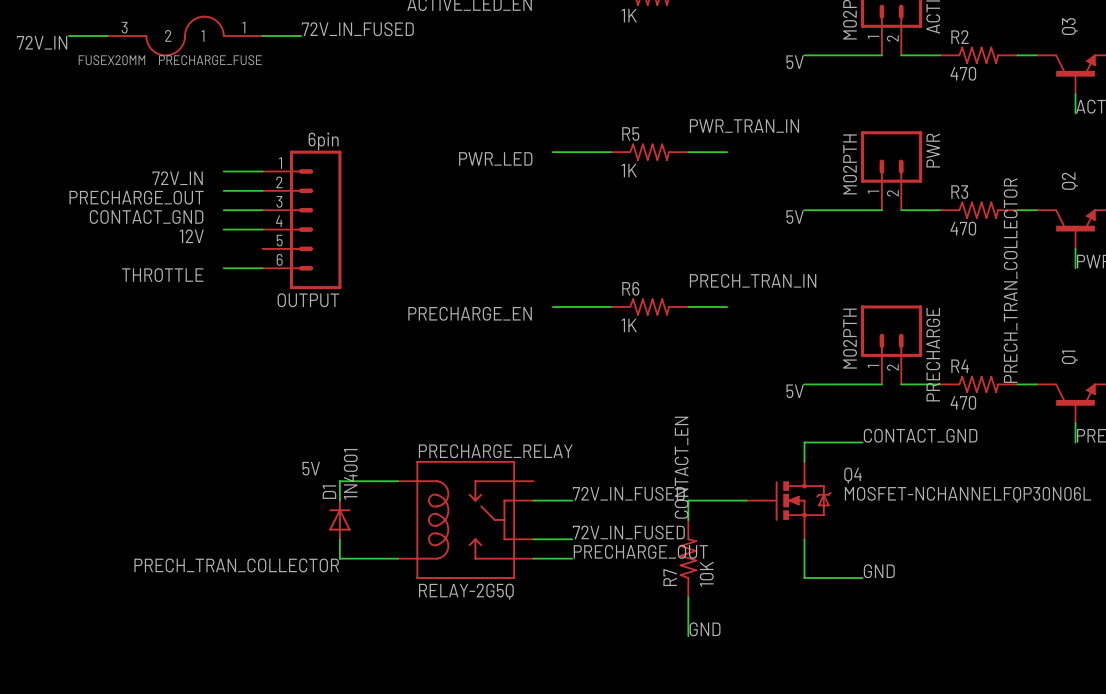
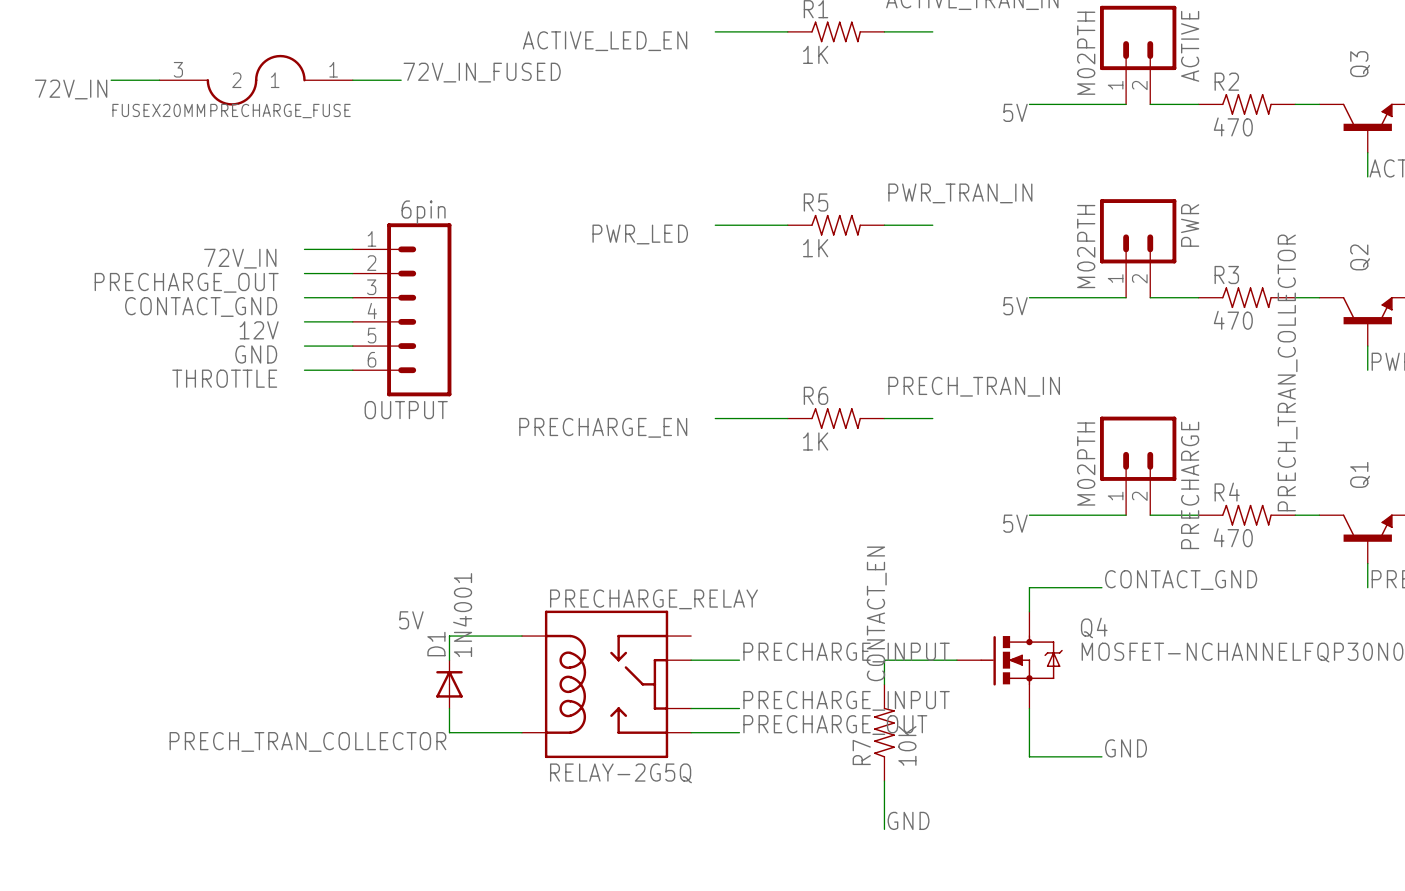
wire: none -> (304, 346) (352, 346)
label: none -> GND (256, 354)
label: 72V_IN_FUSED (628, 493) -> PRECHARGE_INPUT (846, 652)
label: 72V_IN_FUSED (628, 532) -> PRECHARGE_INPUT (846, 700)

